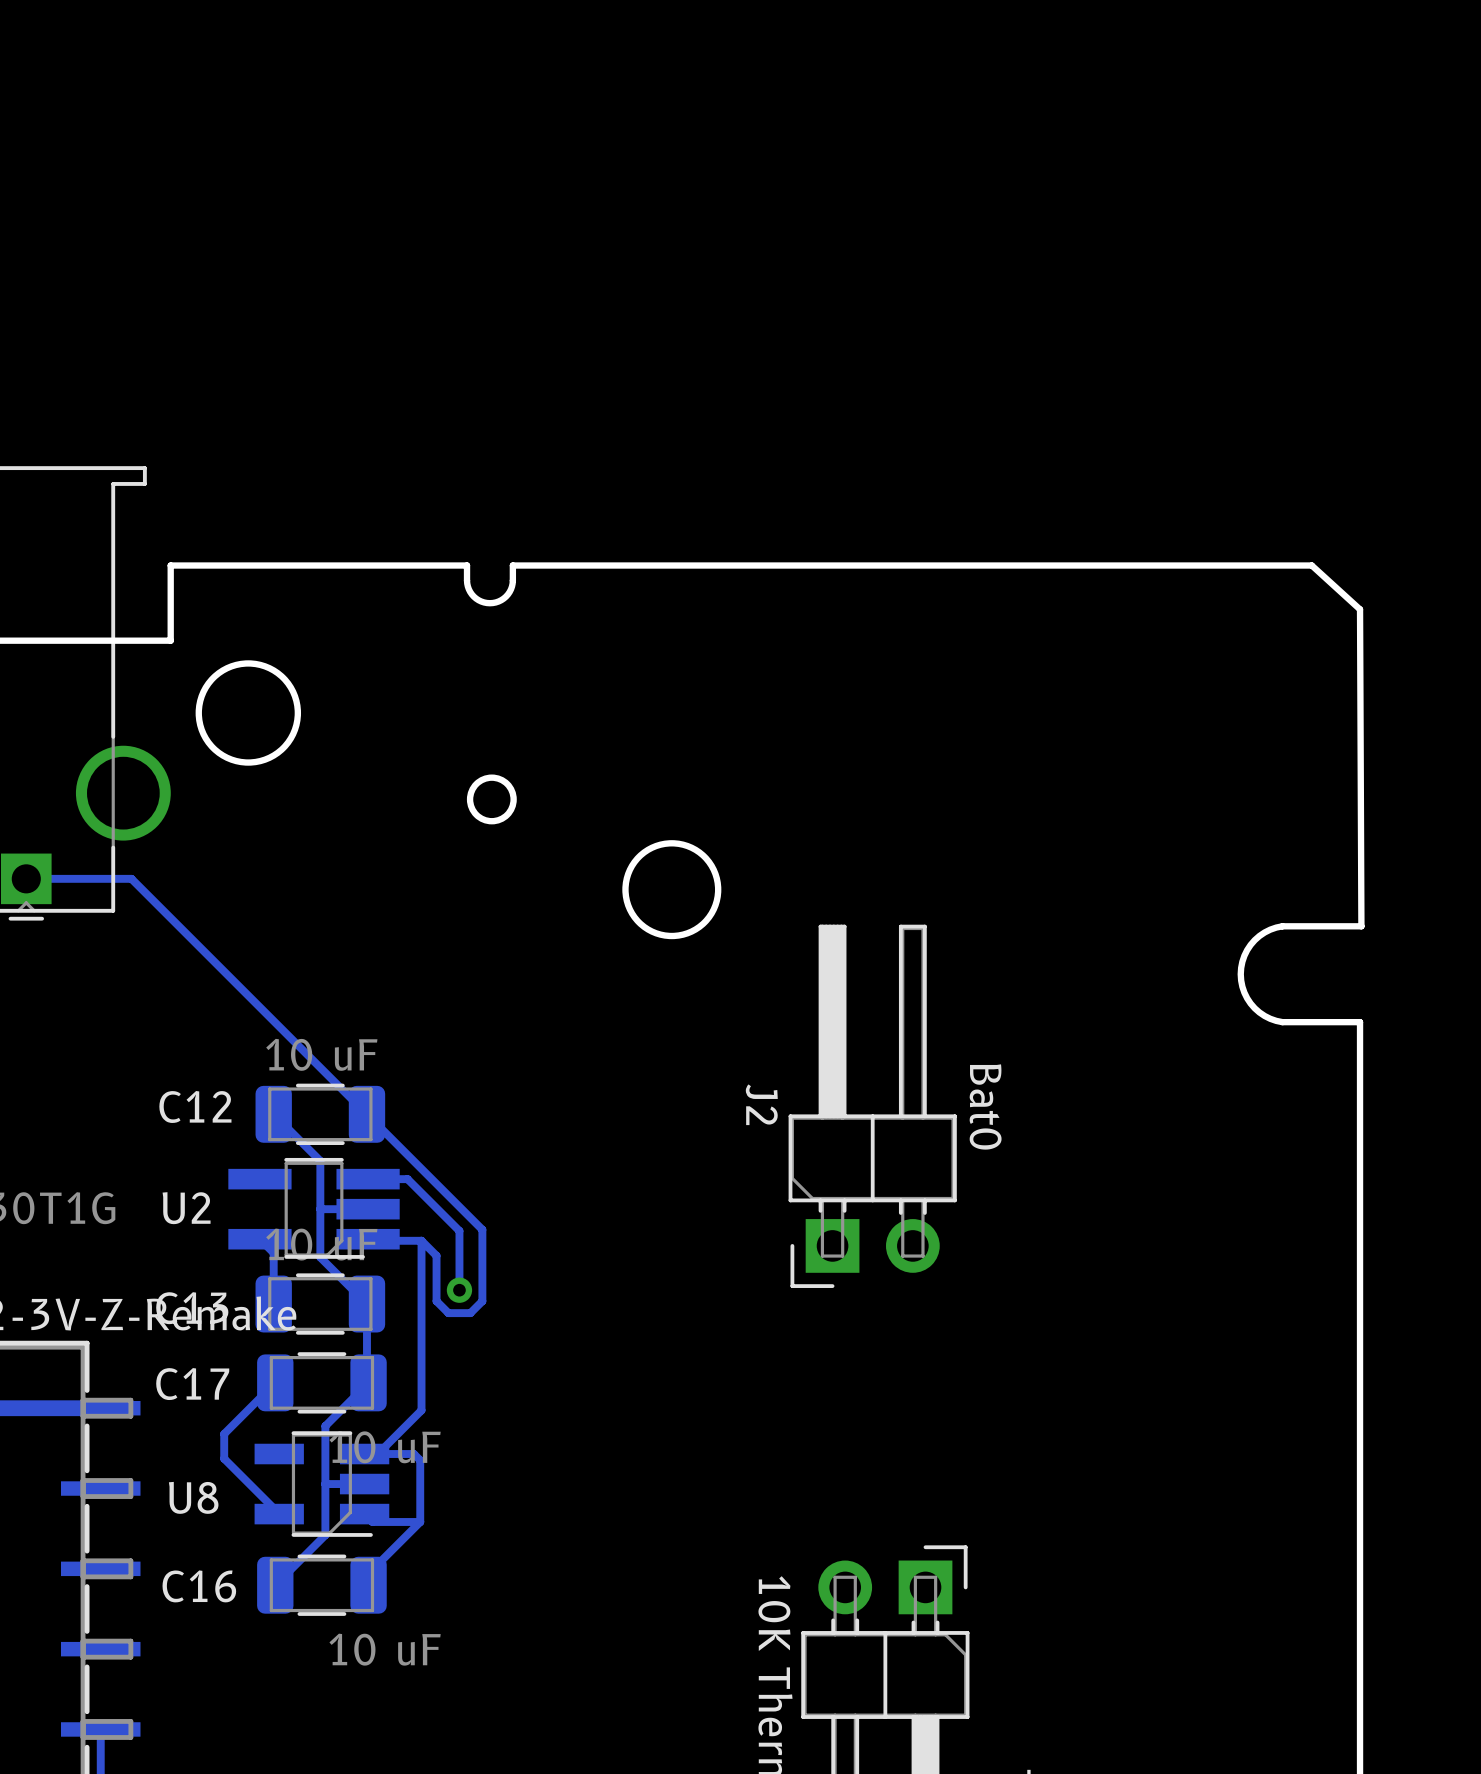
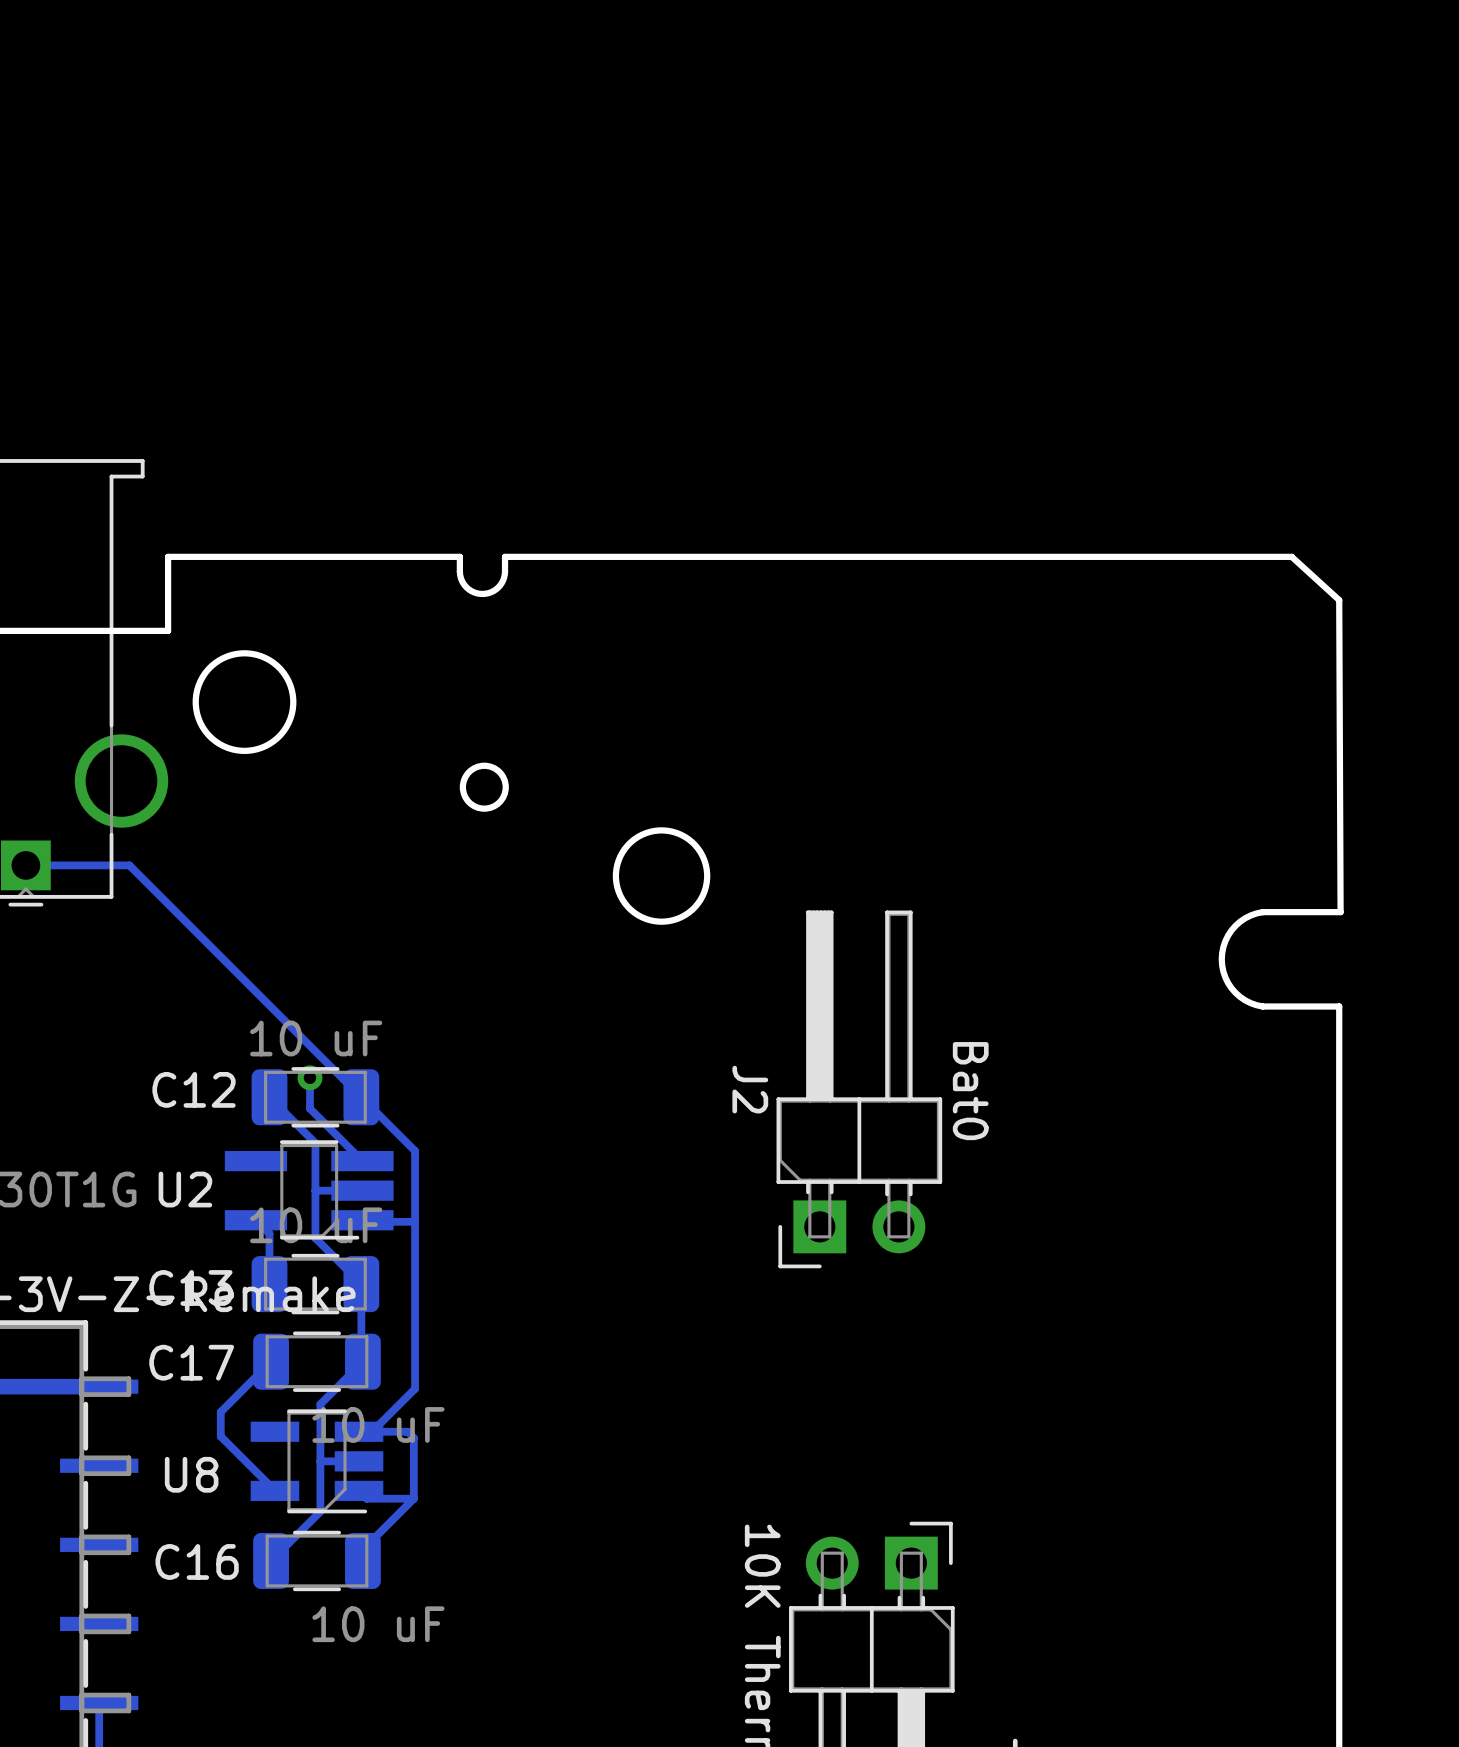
via: none -> (309, 1077)
track: (421, 1168) (482, 1229) (482, 1301) (470, 1313) (448, 1313) (436, 1301) (436, 1255) (421, 1240) -> (415, 1150) (415, 1221)
track: (368, 1179) (407, 1179) (459, 1230) (459, 1290) -> (362, 1161) (309, 1108) (309, 1077)
via: (459, 1290) -> none

